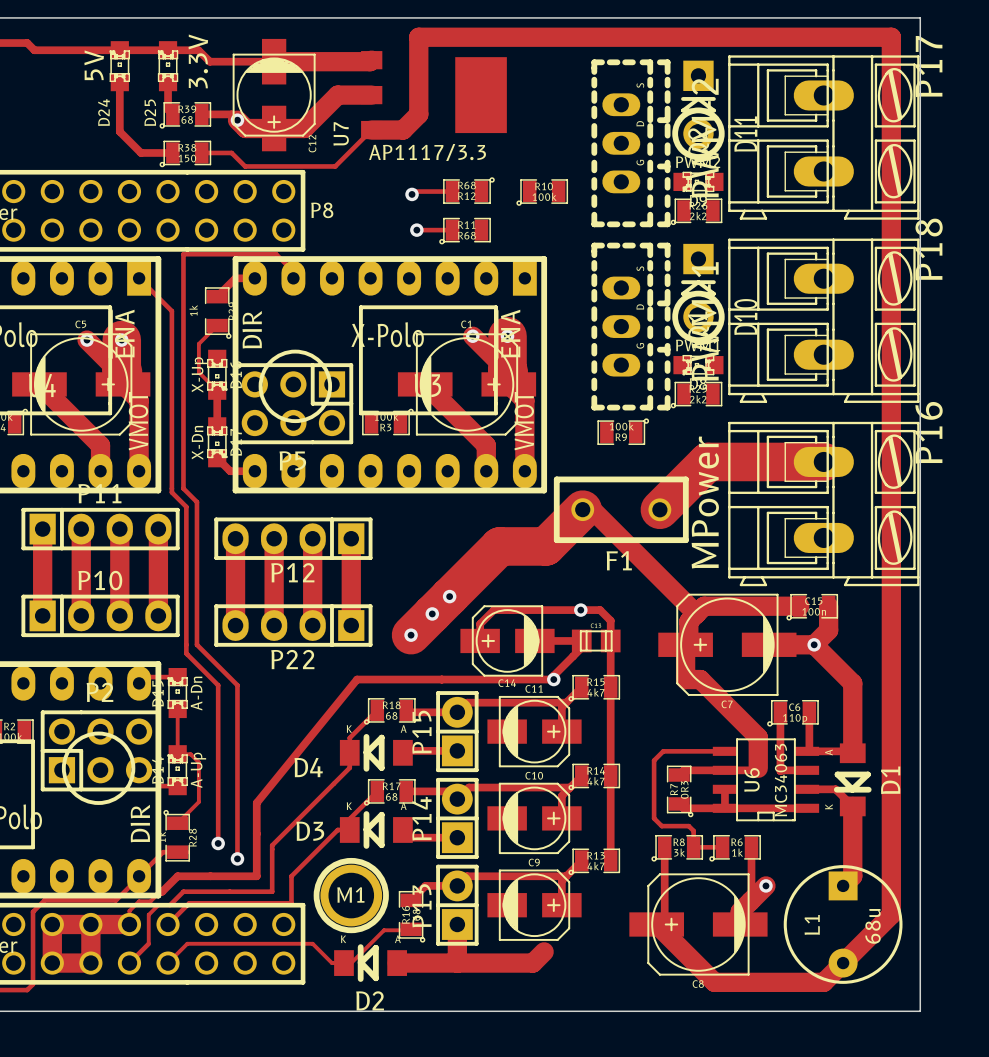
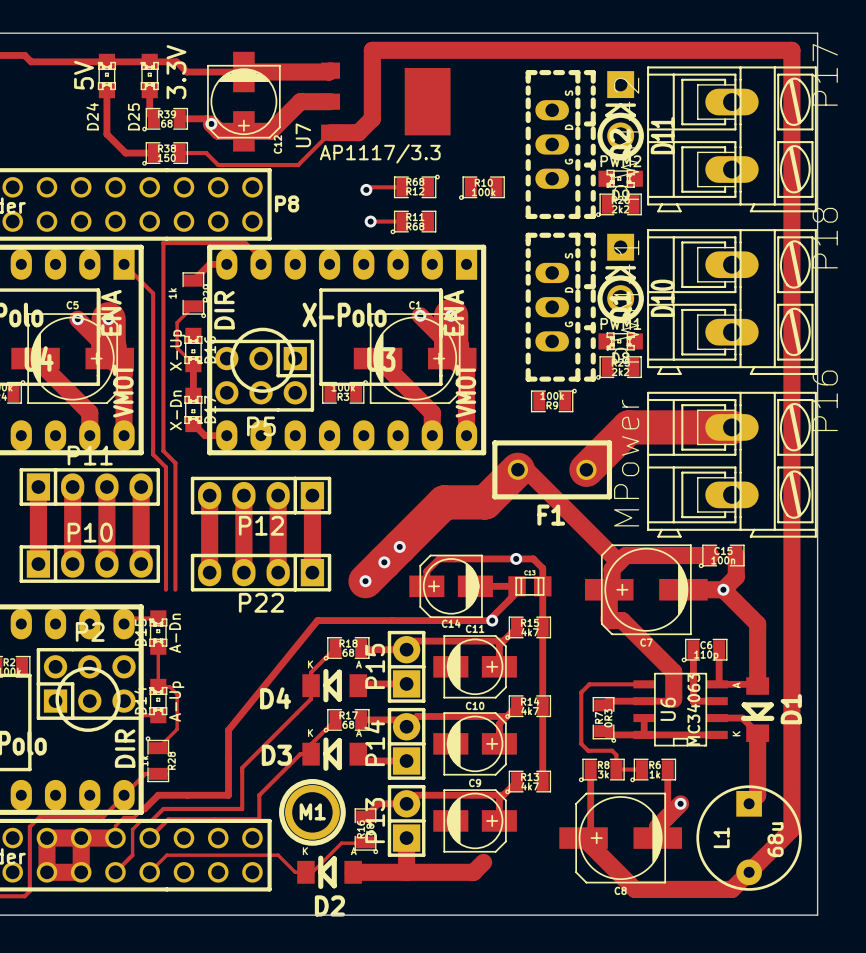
track: (186, 644) (186, 653) (218, 685) (218, 843) -> none
track: (196, 644) (237, 685) (237, 858) -> none
via: (218, 843) -> none
via: (237, 858) -> none

